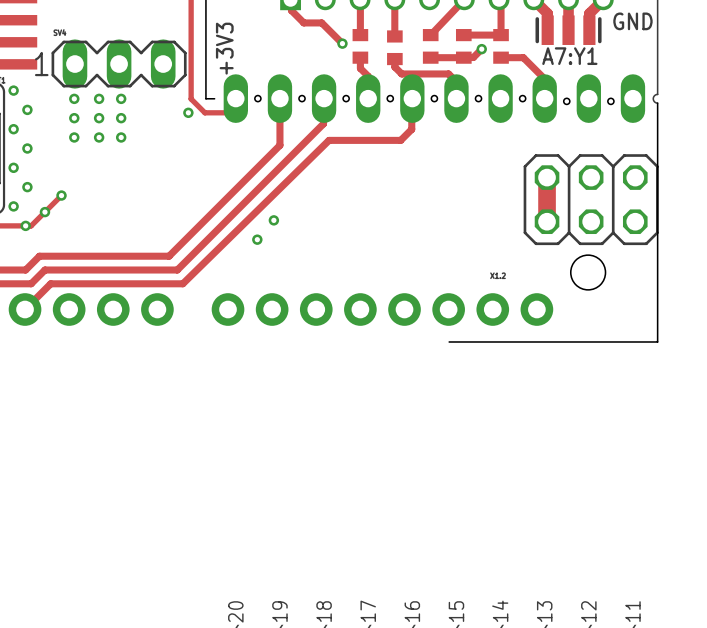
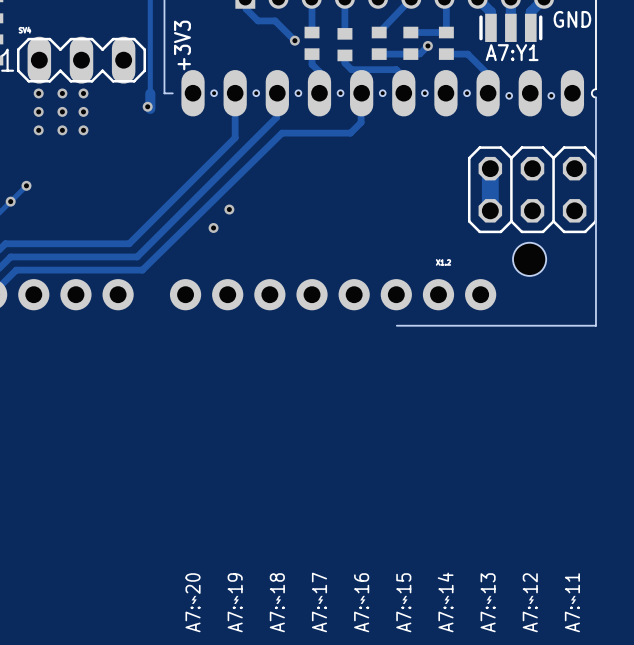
track: (191, 99) (204, 112) (229, 112) -> (150, 93) (150, 108)

